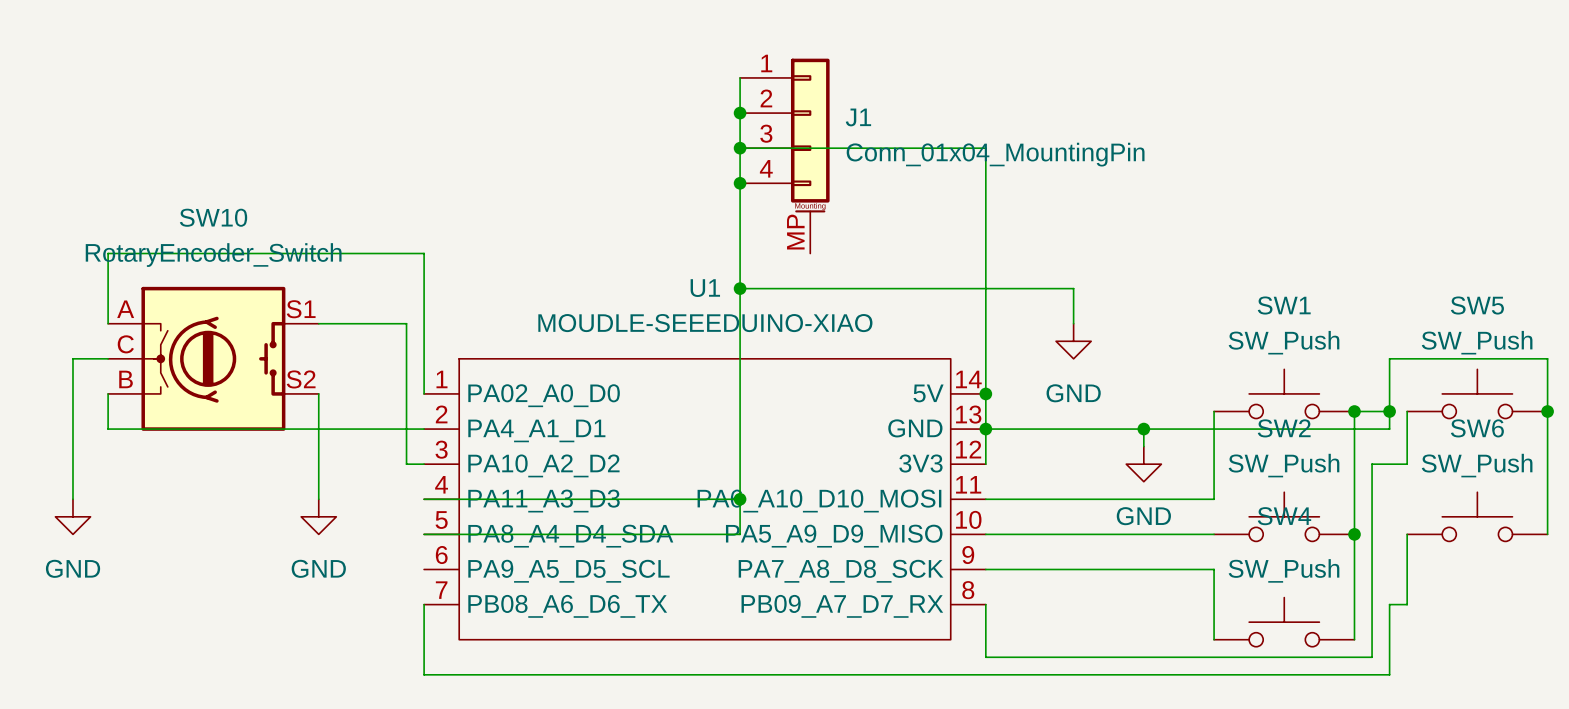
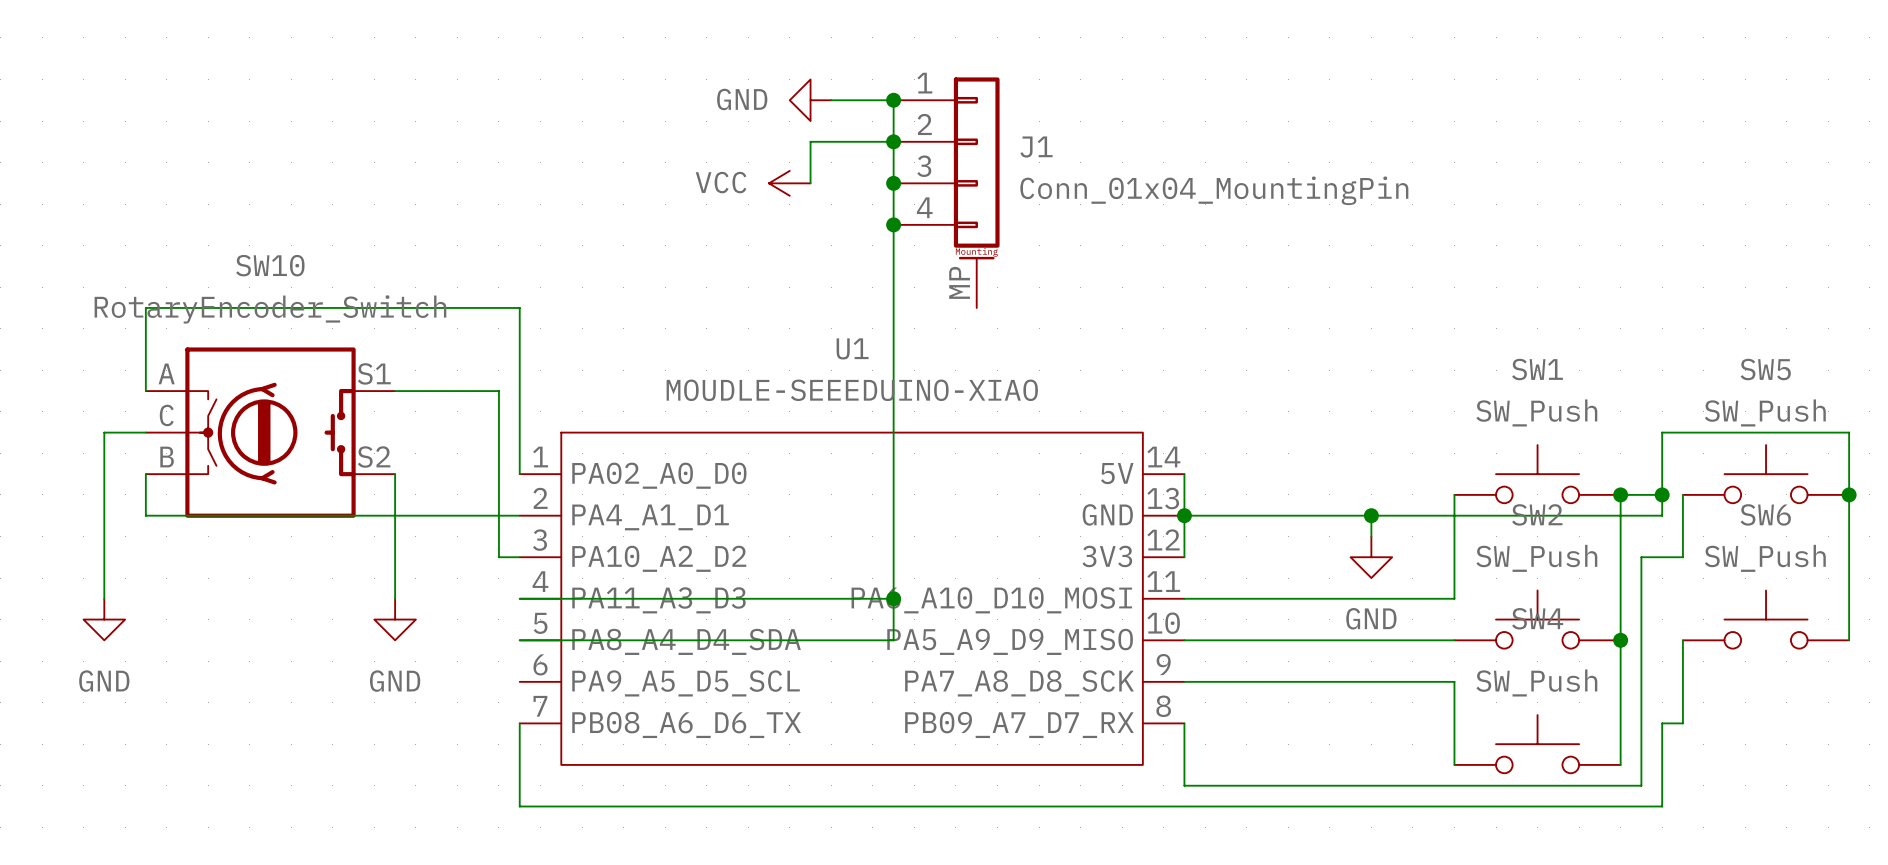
power symbol: none -> GND (810, 100)
wire: none -> (831, 100) (893, 100)
junction: none -> (893, 100)
wire: none -> (893, 141) (810, 141) (810, 183)
power symbol: none -> VCC (789, 183)
wire: (740, 148) (985, 148) (985, 393) -> none
wire: (740, 288) (1073, 288) (1073, 323) -> none
junction: (740, 288) -> none
power symbol: GND (1073, 341) -> none
junction: (985, 393) -> none

